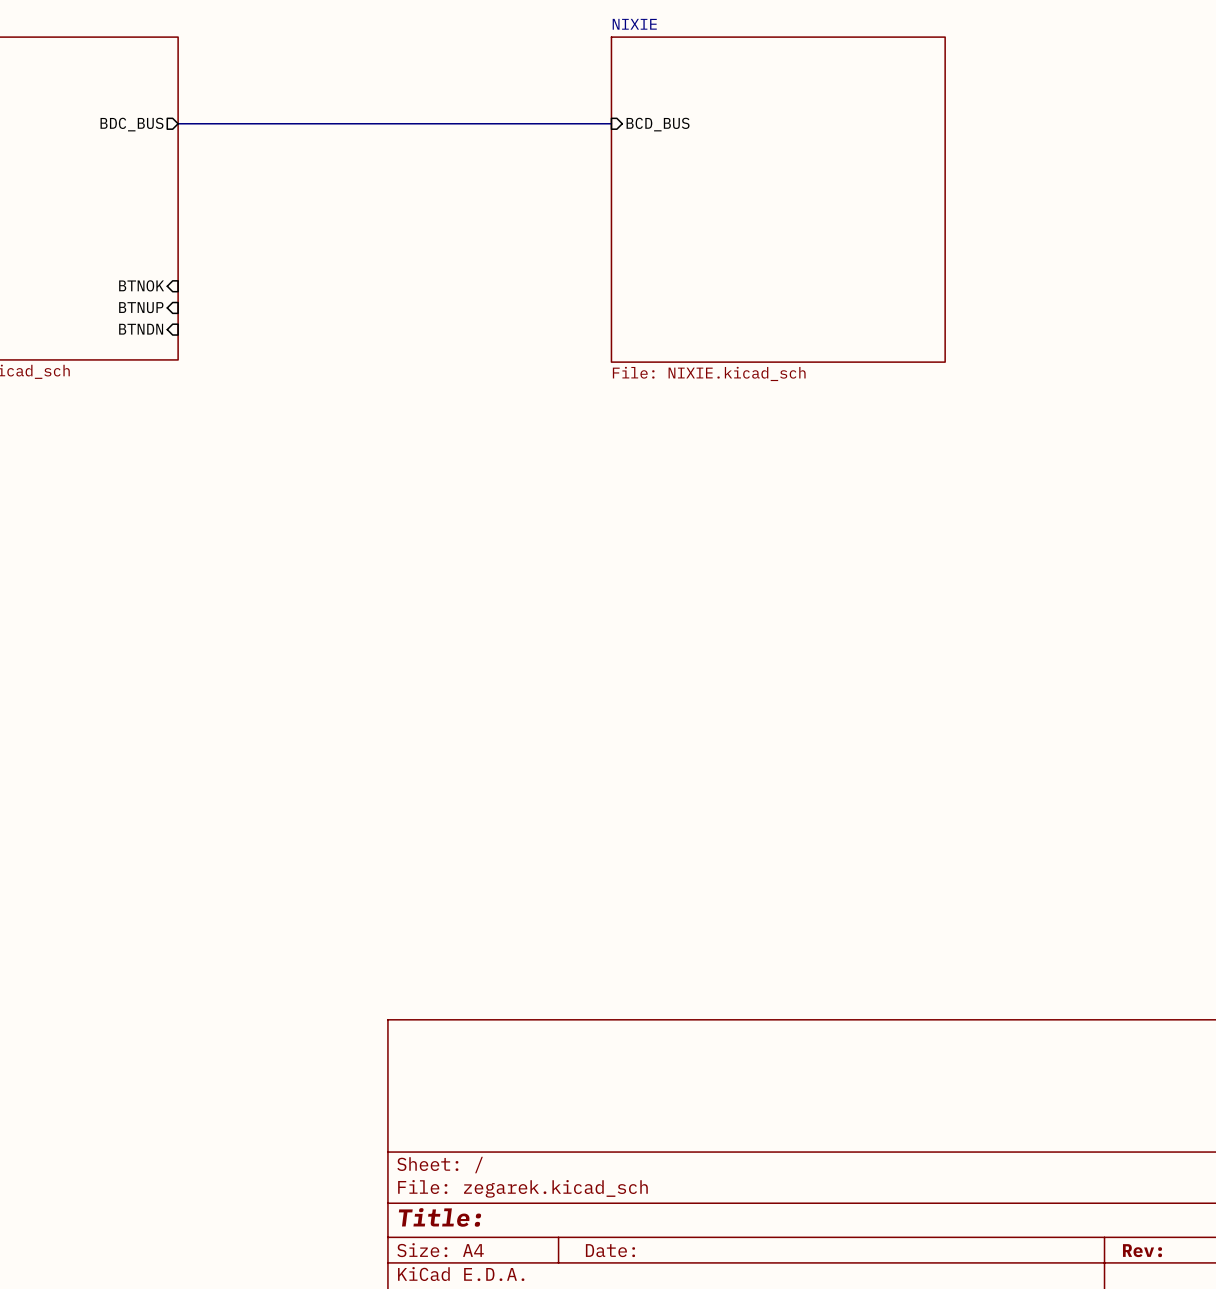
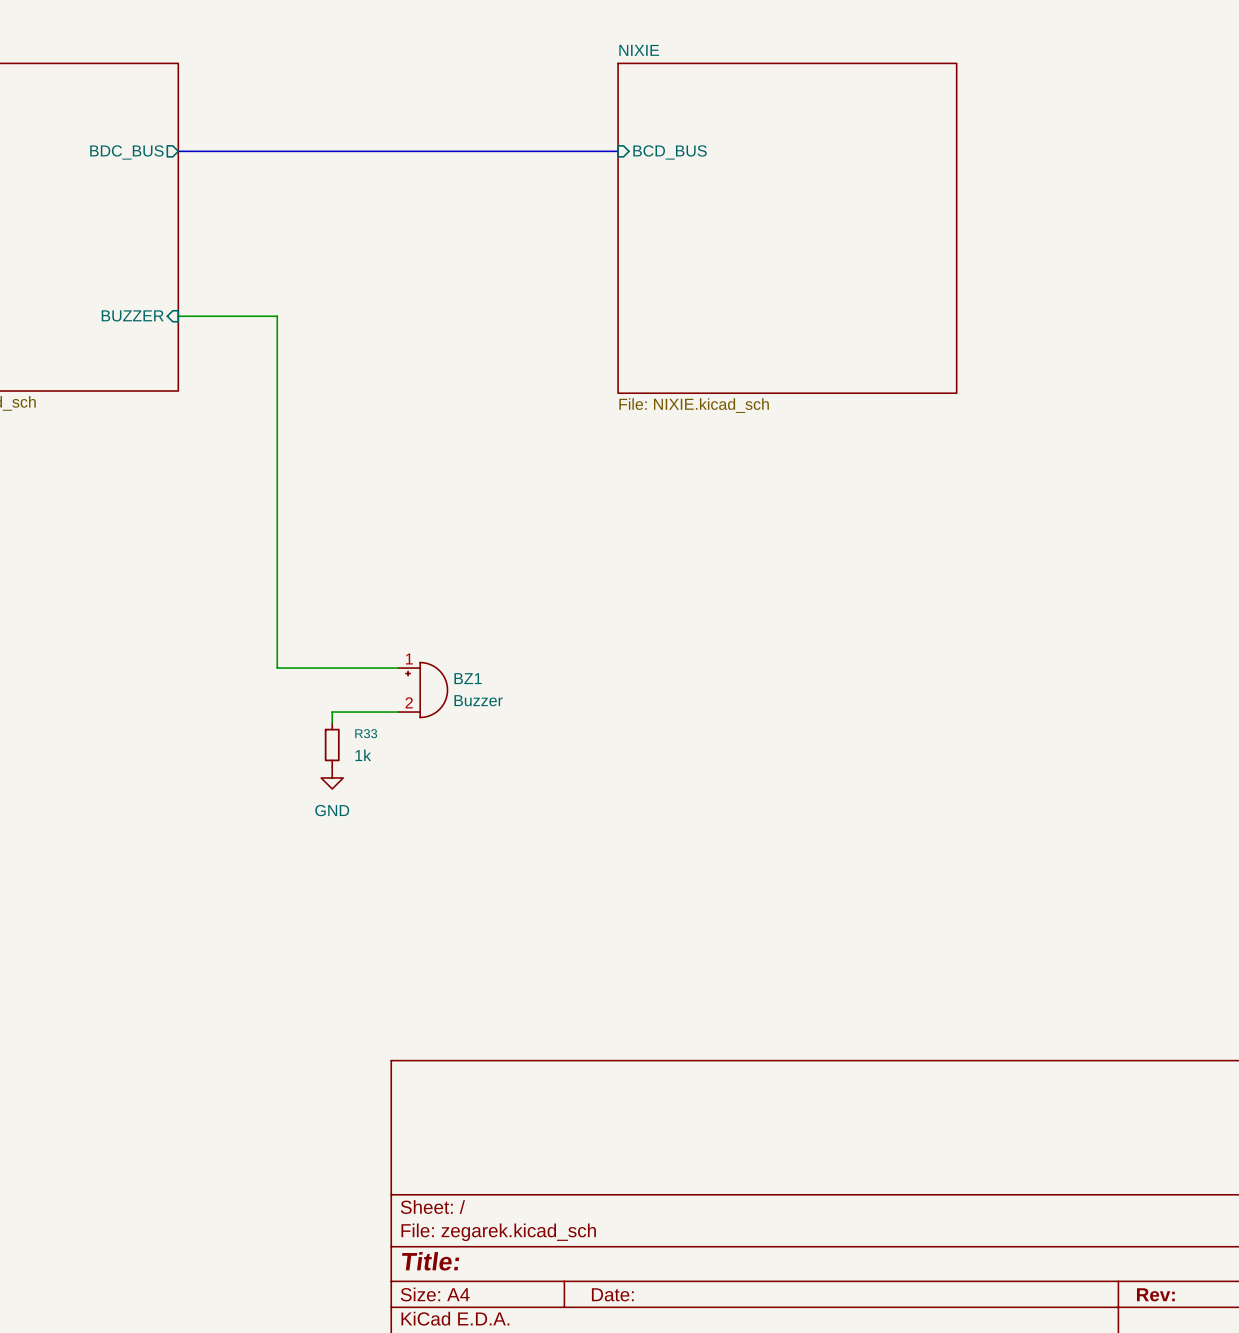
sheet pin: BTNOK (141, 285) -> BUZZER (132, 315)
wire: none -> (178, 316) (277, 316) (277, 668) (398, 668)
sheet pin: BTNUP (141, 307) -> none
sheet pin: BTNDN (141, 329) -> none
BZ1: none -> Buzzer (422, 690)
wire: none -> (398, 712) (332, 712) (332, 723)
R33: none -> 1k (332, 745)
power symbol: none -> GND (332, 777)

